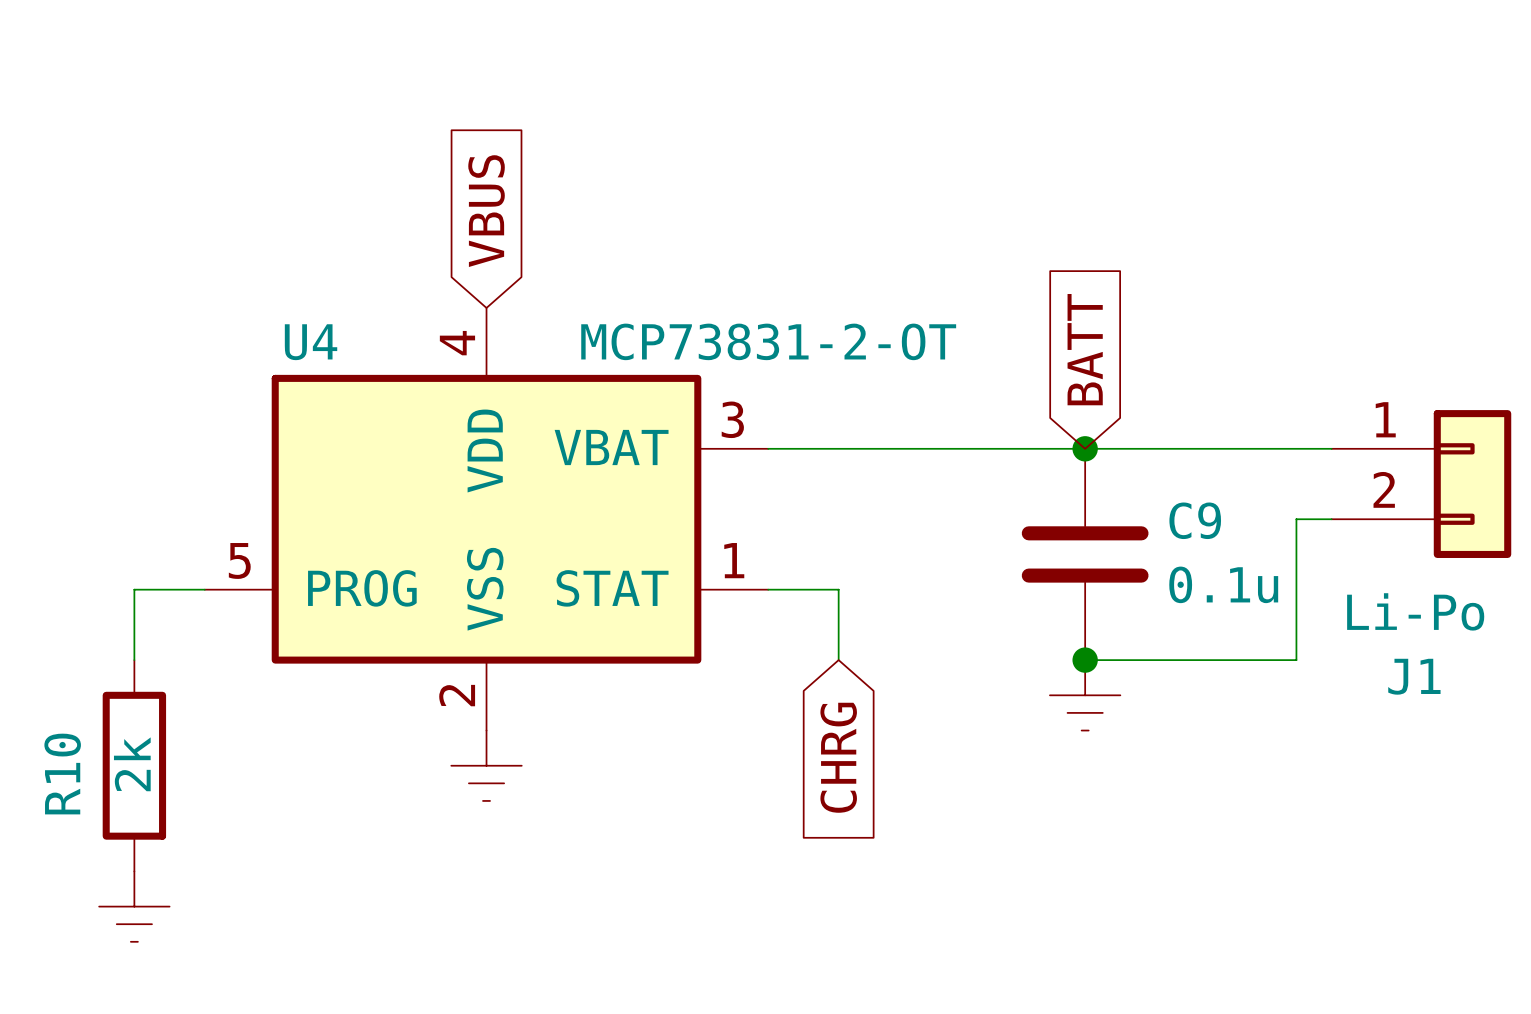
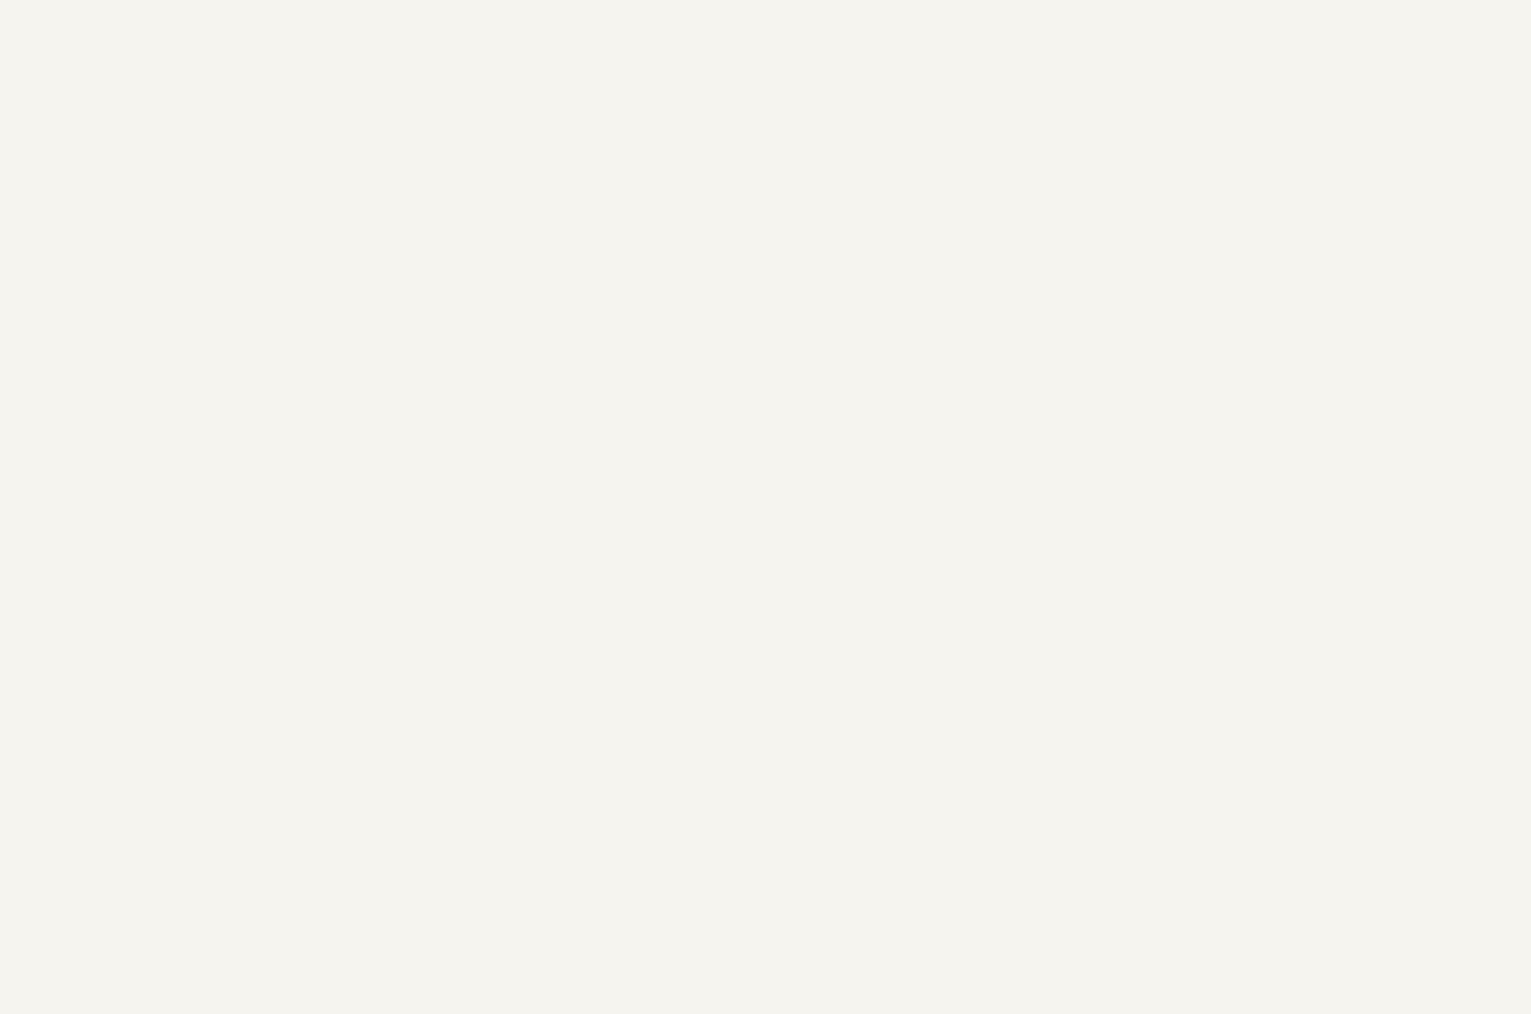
global label: VBUS (486, 211) -> none
global label: BATT (1085, 349) -> none
wire: (768, 448) (1331, 448) -> none
junction: (1085, 448) -> none
J1: Li-Po (1421, 484) -> none
U4: MCP73831-2-OT (486, 519) -> none
wire: (1331, 519) (1296, 519) (1296, 660) (1085, 660) -> none
C9: 0.1u (1085, 554) -> none
wire: (204, 589) (134, 589) (134, 660) -> none
wire: (768, 589) (838, 589) (838, 660) -> none
junction: (1085, 660) -> none
power symbol: (1085, 695) -> none
global label: CHRG (838, 757) -> none
R10: 2k (134, 765) -> none
power symbol: (486, 765) -> none
power symbol: (134, 906) -> none

